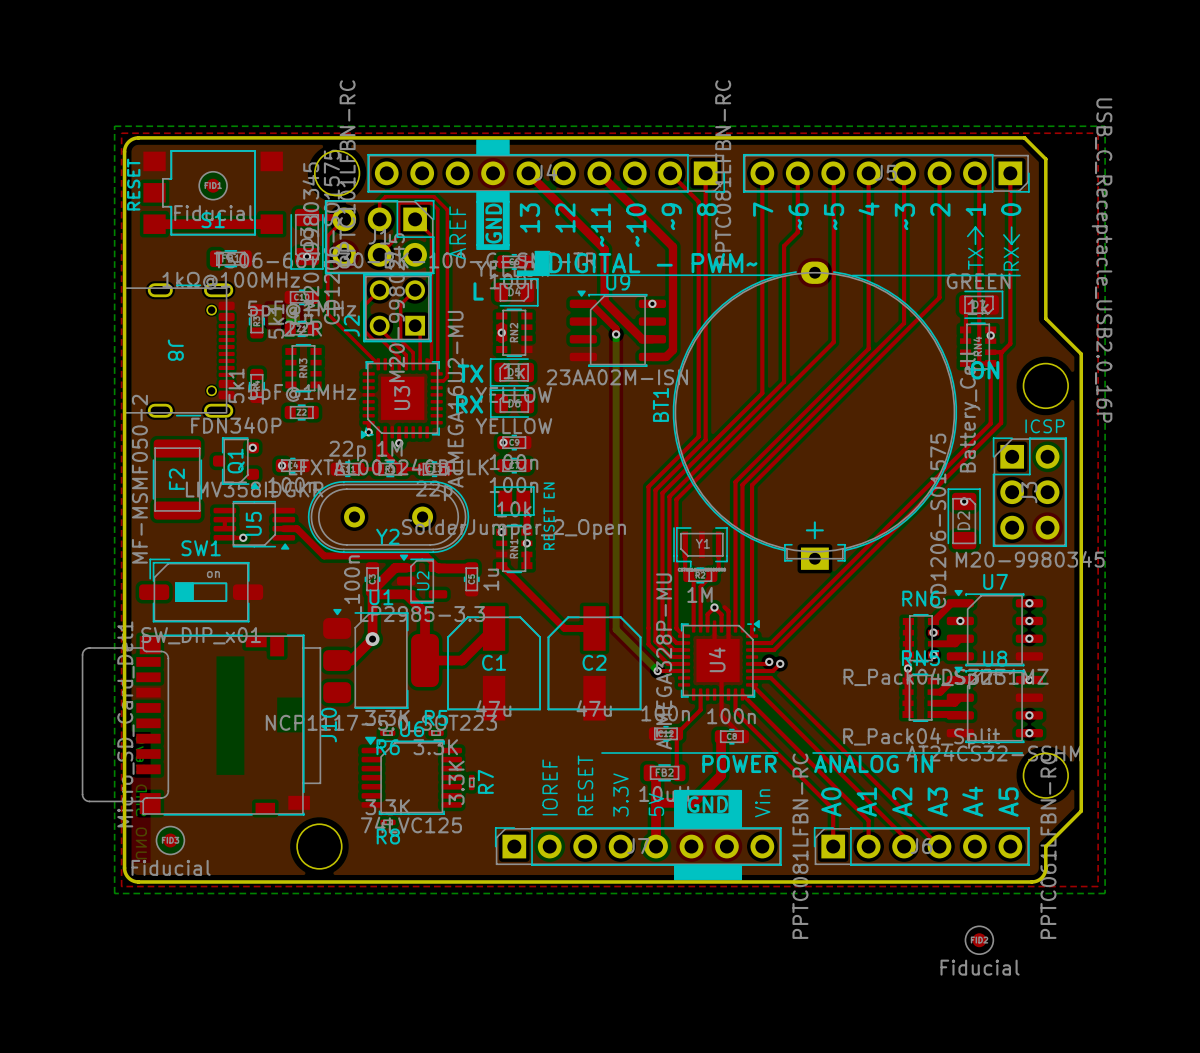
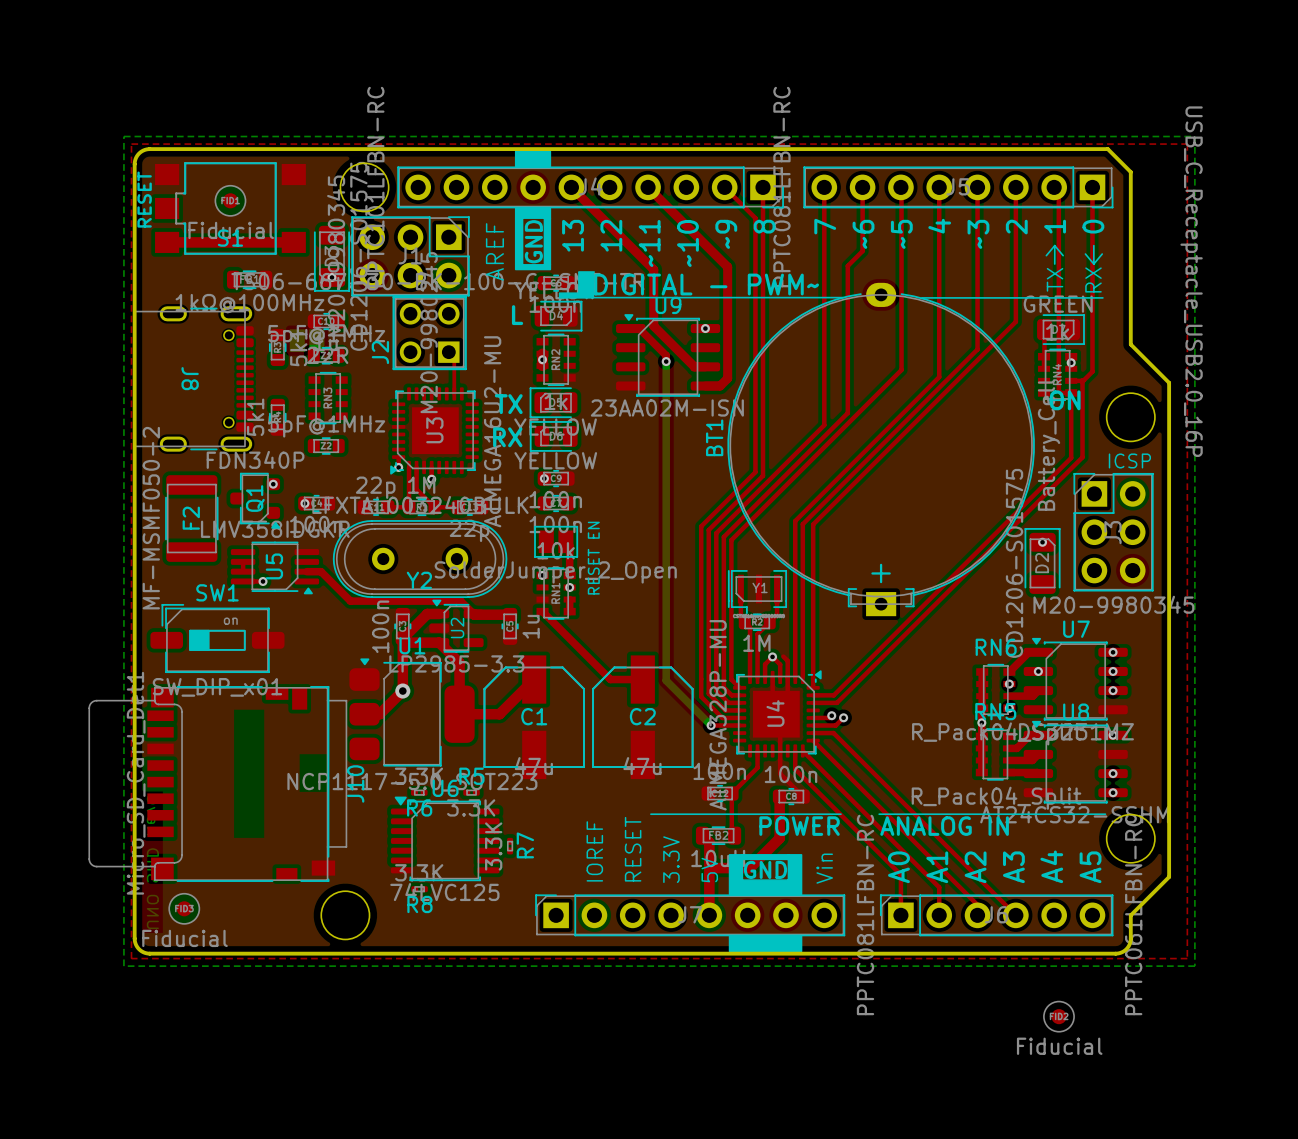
top track: (307, 217) (342, 217) (344, 219) (327, 235) (327, 313) (378, 364) -> none
top track: (379, 219) (379, 202) (385, 196) (434, 196) (447, 209) (447, 377) (443, 380) (436, 380) -> none
top track: (415, 219) (431, 235) (431, 359) (427, 364) -> none
top track: (379, 254) (398, 235) (398, 202) (431, 202) (437, 209) (436, 373) -> none
top track: (379, 290) (365, 304) (365, 331) (373, 340) (381, 340) (399, 357) (399, 364) -> none
top track: (415, 290) (400, 304) (400, 340) (413, 352) (413, 364) -> none
top track: (379, 325) (379, 328) (406, 355) (406, 364) -> none

